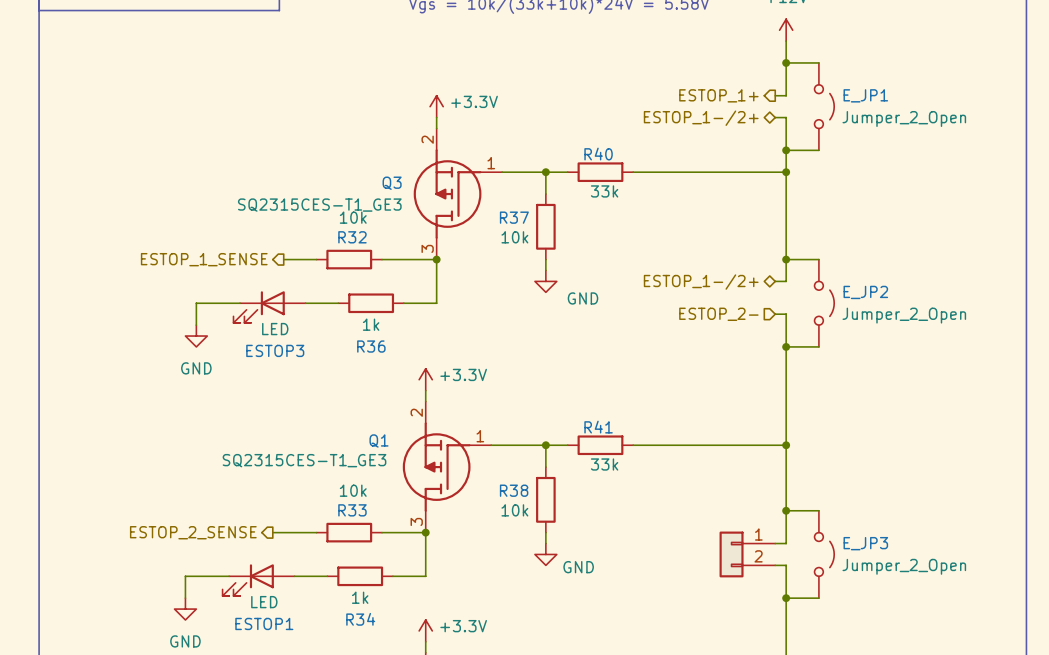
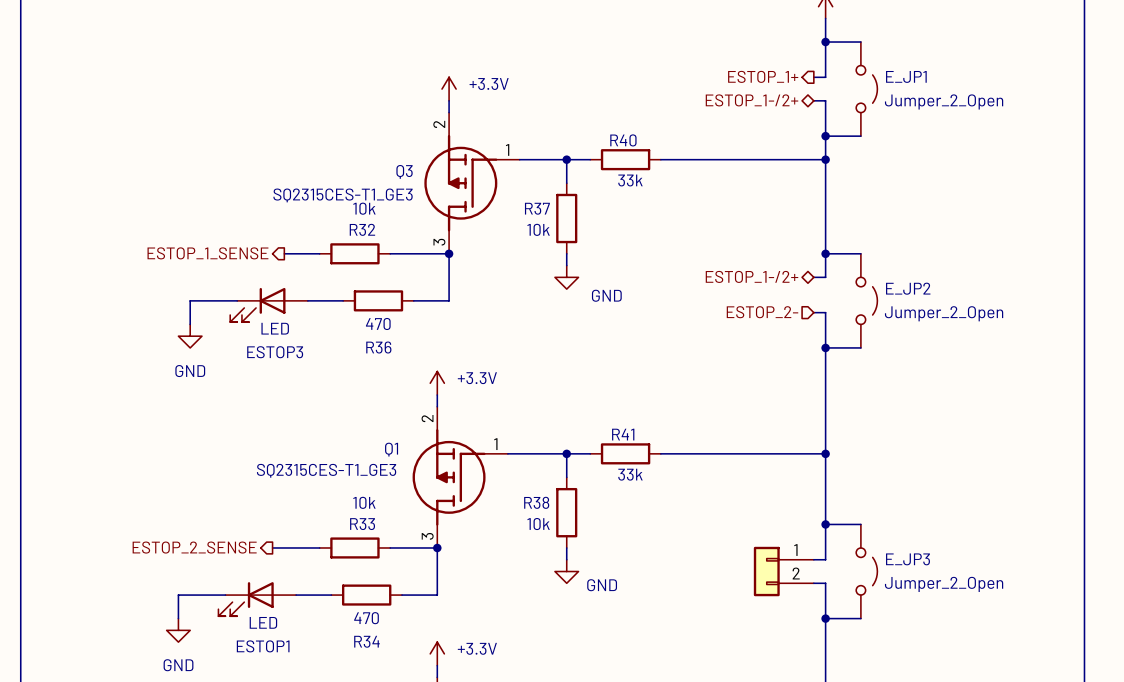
R36 value: 1k (371, 324) -> 470 (378, 323)
R34 value: 1k (360, 597) -> 470 (366, 618)

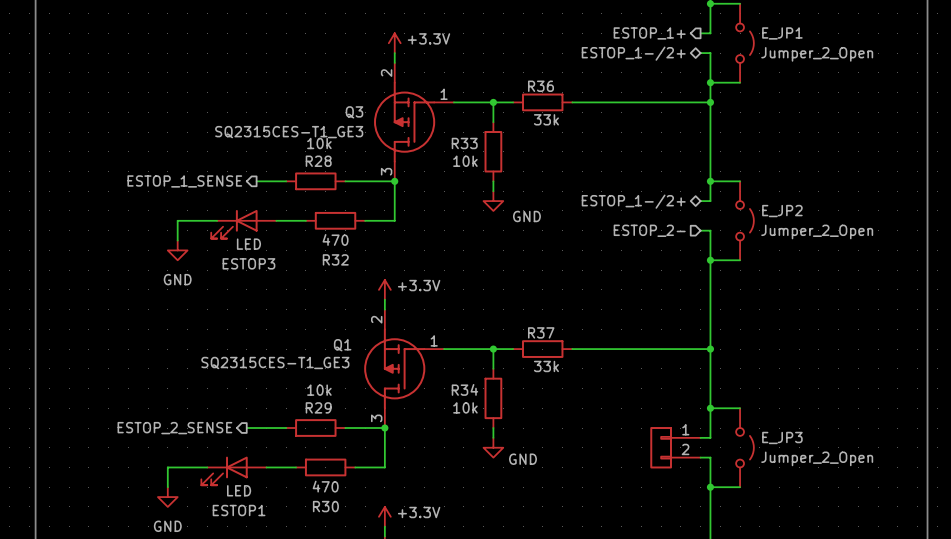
R40 name: R40 (623, 140) -> R36 (540, 86)
R37 name: R37 (537, 208) -> R33 (464, 143)
R32 name: R32 (362, 229) -> R28 (318, 161)
R36 name: R36 (378, 347) -> R32 (335, 259)
R41 name: R41 (623, 434) -> R37 (541, 332)
R38 name: R38 (536, 502) -> R34 (464, 389)
R33 name: R33 (362, 524) -> R29 (318, 407)
R34 name: R34 (366, 641) -> R30 (325, 506)

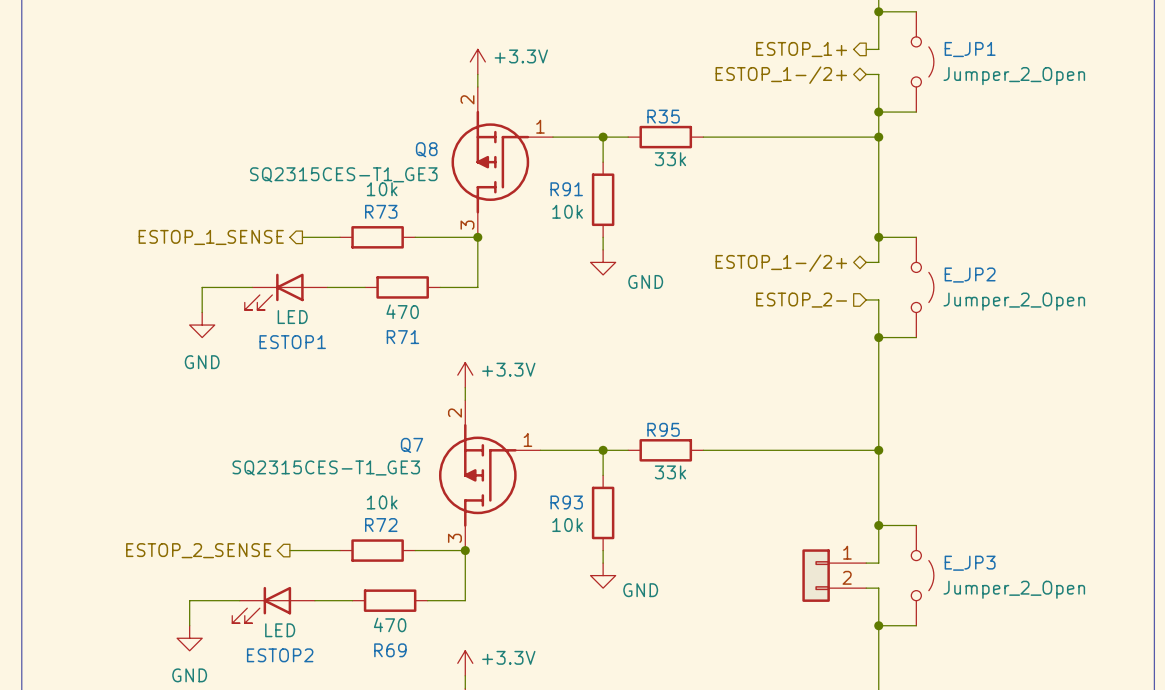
R36 name: R36 (540, 86) -> R35 (663, 116)
Q3 name: Q3 (354, 112) -> Q8 (426, 149)
R33 name: R33 (464, 143) -> R91 (566, 189)
R28 name: R28 (318, 161) -> R73 (381, 211)
R32 name: R32 (335, 259) -> R71 (402, 337)
ESTOP3 name: ESTOP3 (248, 263) -> ESTOP1 (292, 342)
R37 name: R37 (541, 332) -> R95 (663, 429)
Q1 name: Q1 (342, 345) -> Q7 (411, 445)
R34 name: R34 (464, 389) -> R93 (566, 502)
R29 name: R29 (318, 407) -> R72 (381, 525)
R30 name: R30 (325, 506) -> R69 (390, 650)
ESTOP1 name: ESTOP1 (239, 510) -> ESTOP2 (280, 655)

